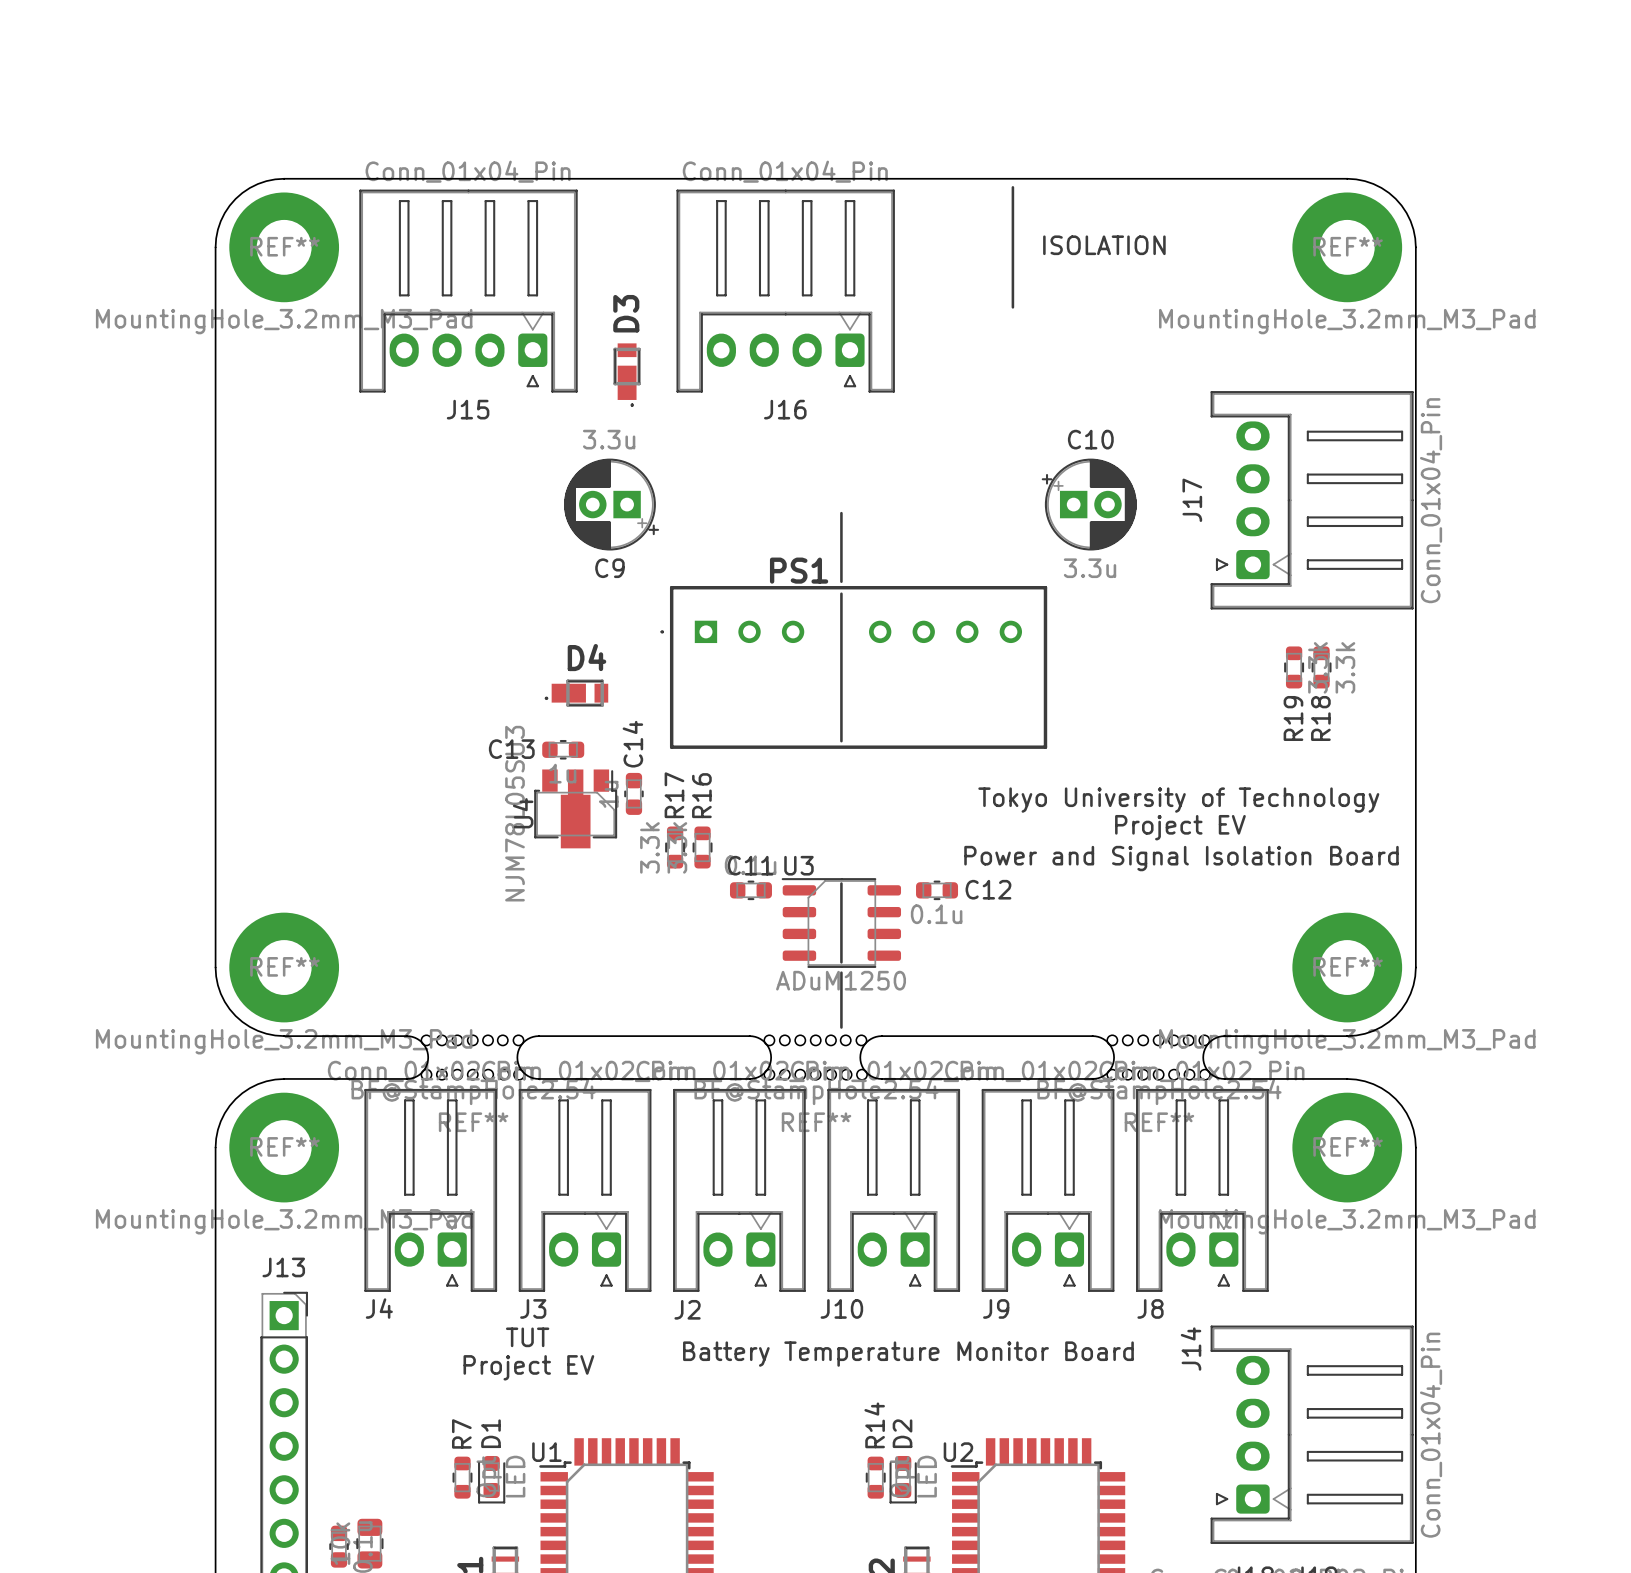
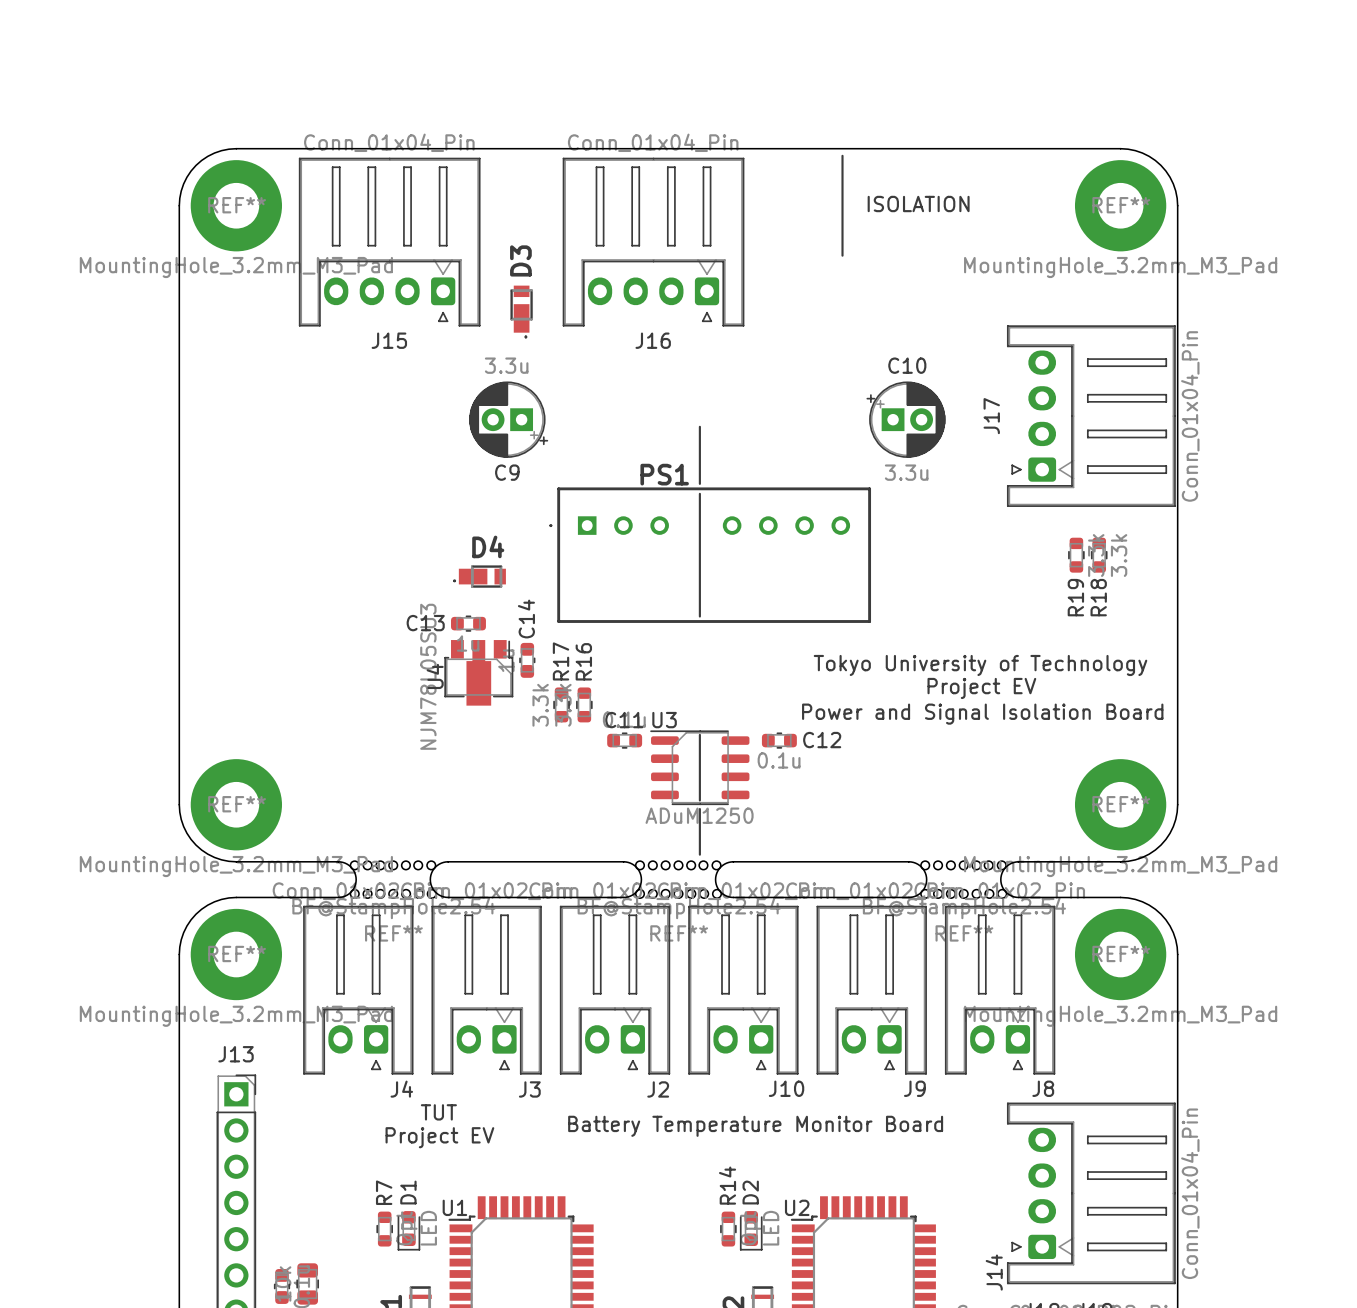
J4 name position: J4 (379, 1308) -> J4 (401, 1089)
J3 name position: J3 (533, 1308) -> J3 (529, 1089)
J10 name position: J10 (841, 1308) -> J10 (786, 1088)
J9 name position: J9 (996, 1308) -> J9 (914, 1088)
J8 name position: J8 (1150, 1308) -> J8 (1043, 1088)
J2 name position: J2 (687, 1309) -> J2 (658, 1089)
J14 name position: J14 (1191, 1349) -> J14 (994, 1272)

